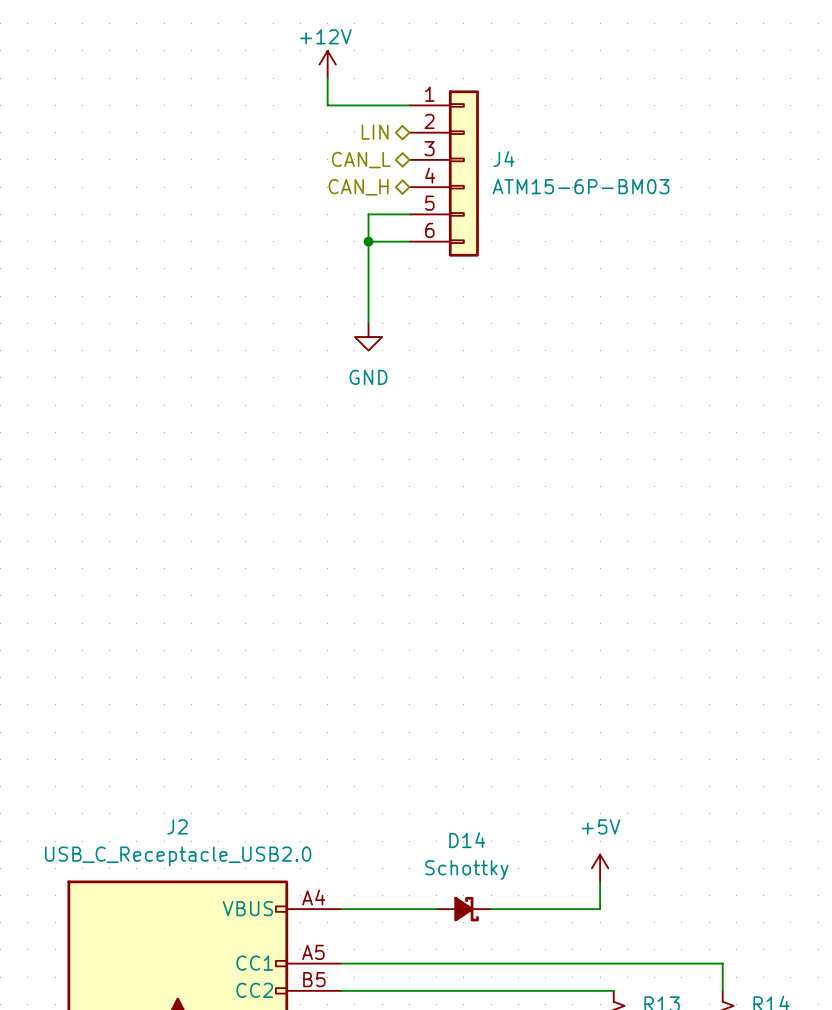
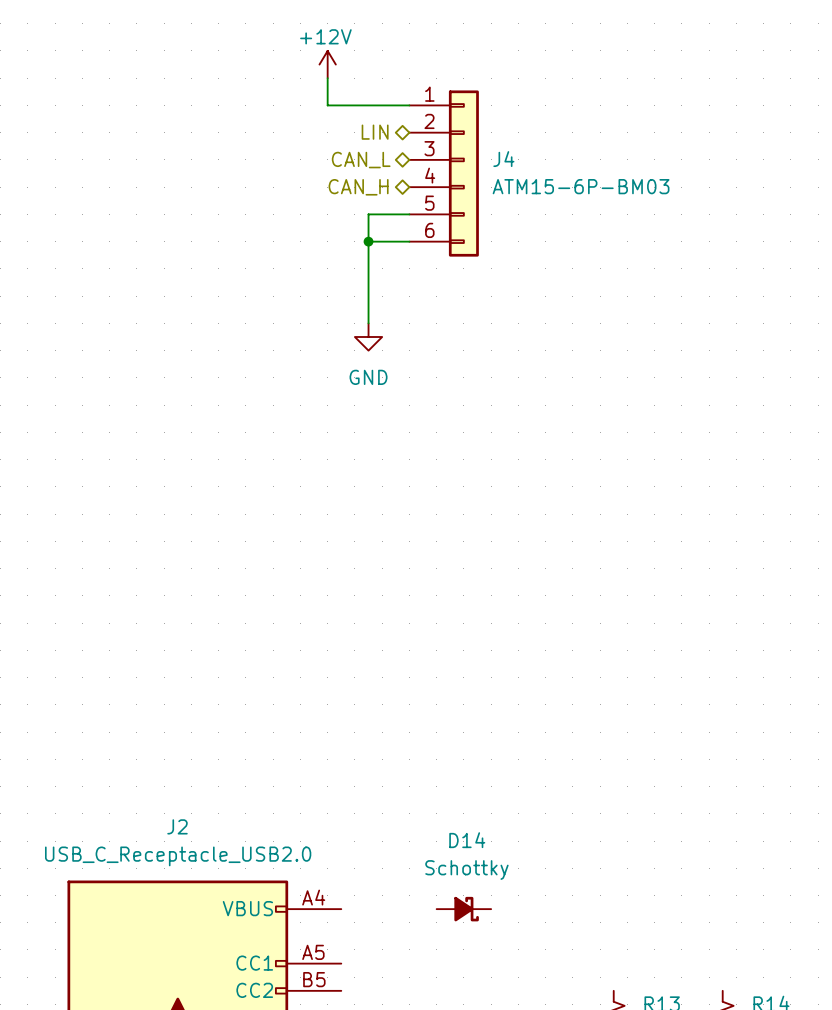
power symbol: +5V (600, 868) -> none
wire: (600, 881) (600, 909) (491, 909) -> none
wire: (341, 909) (436, 909) -> none
wire: (341, 963) (722, 963) (722, 990) -> none
wire: (341, 990) (613, 990) -> none

